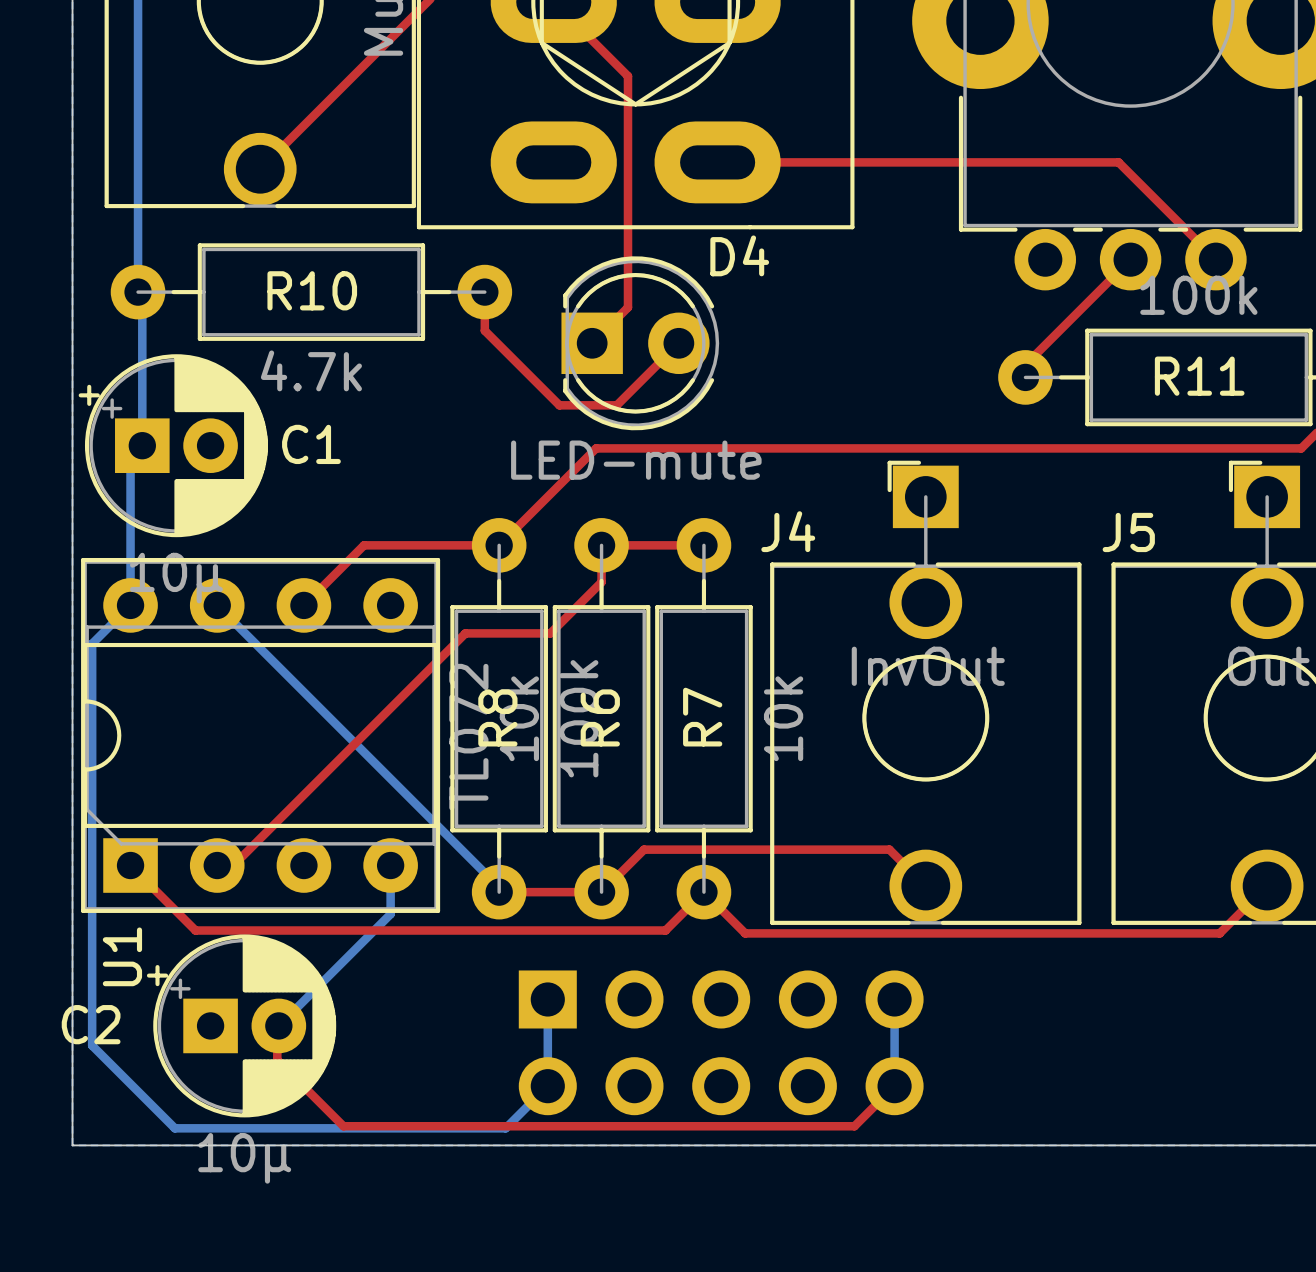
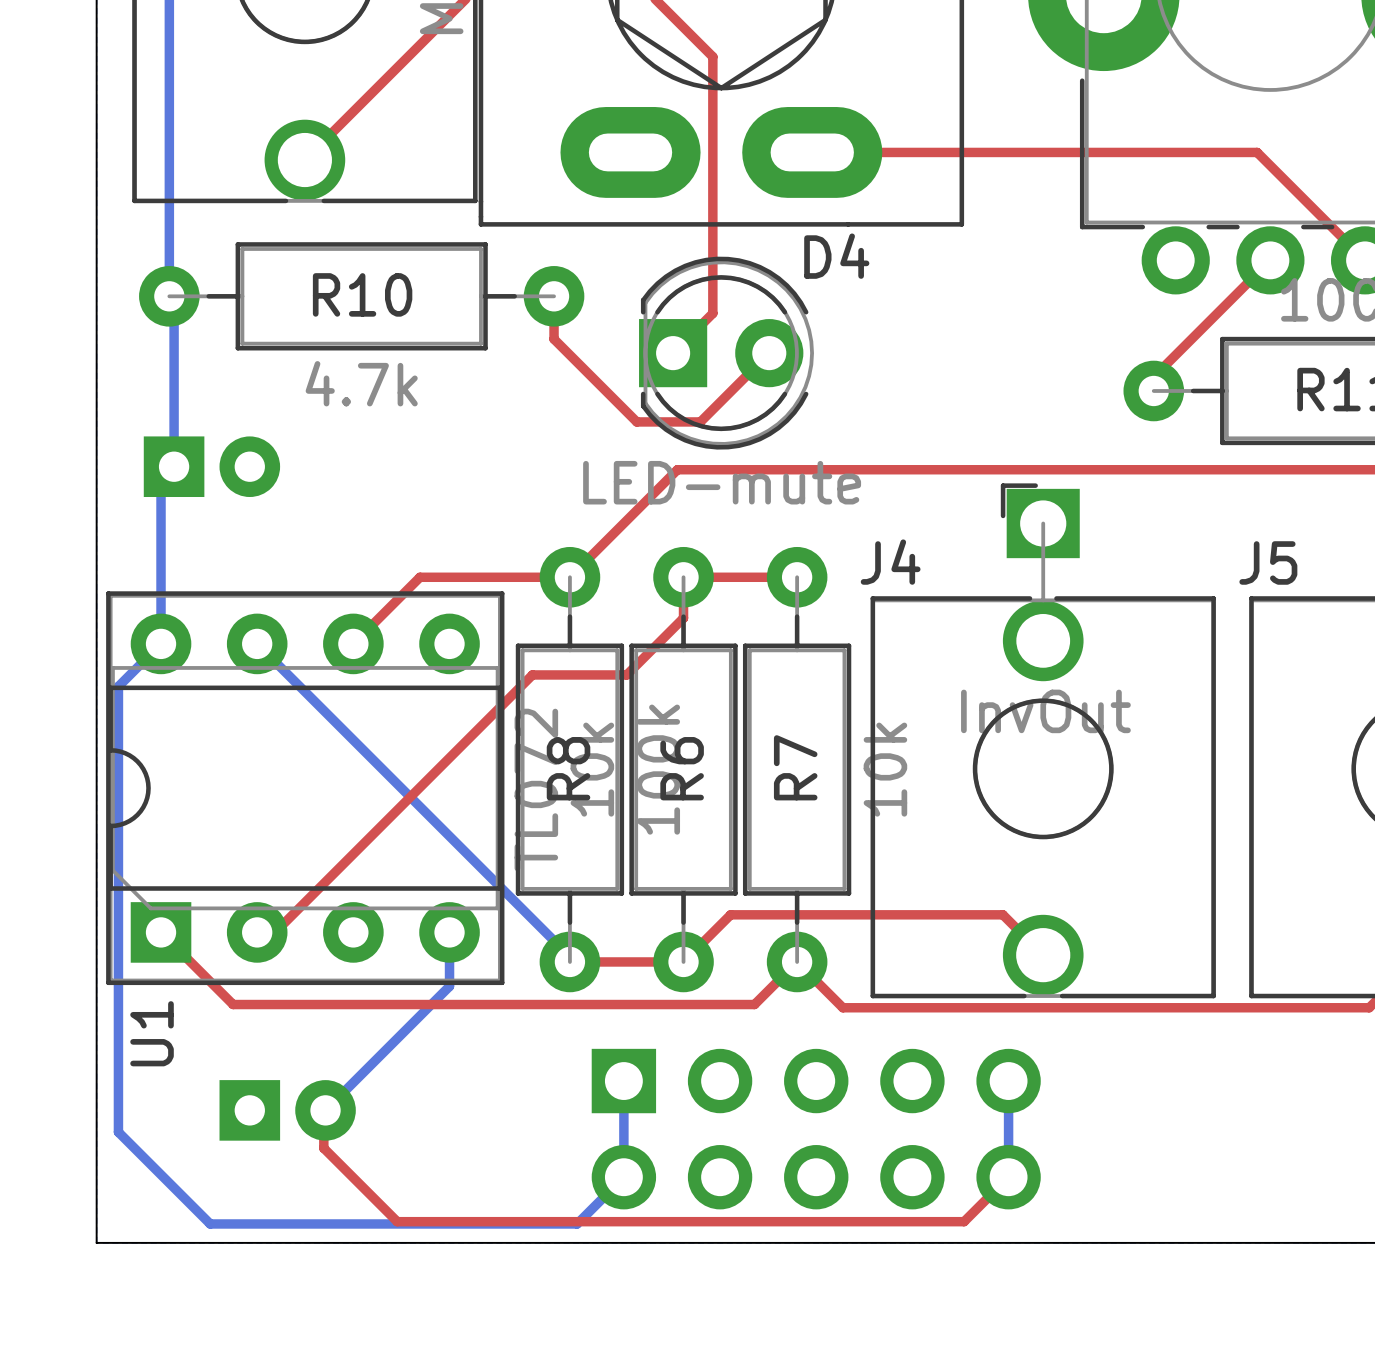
C1 side: top (173, 445) -> bottom (211, 466)
C2 side: top (241, 1025) -> bottom (287, 1110)

